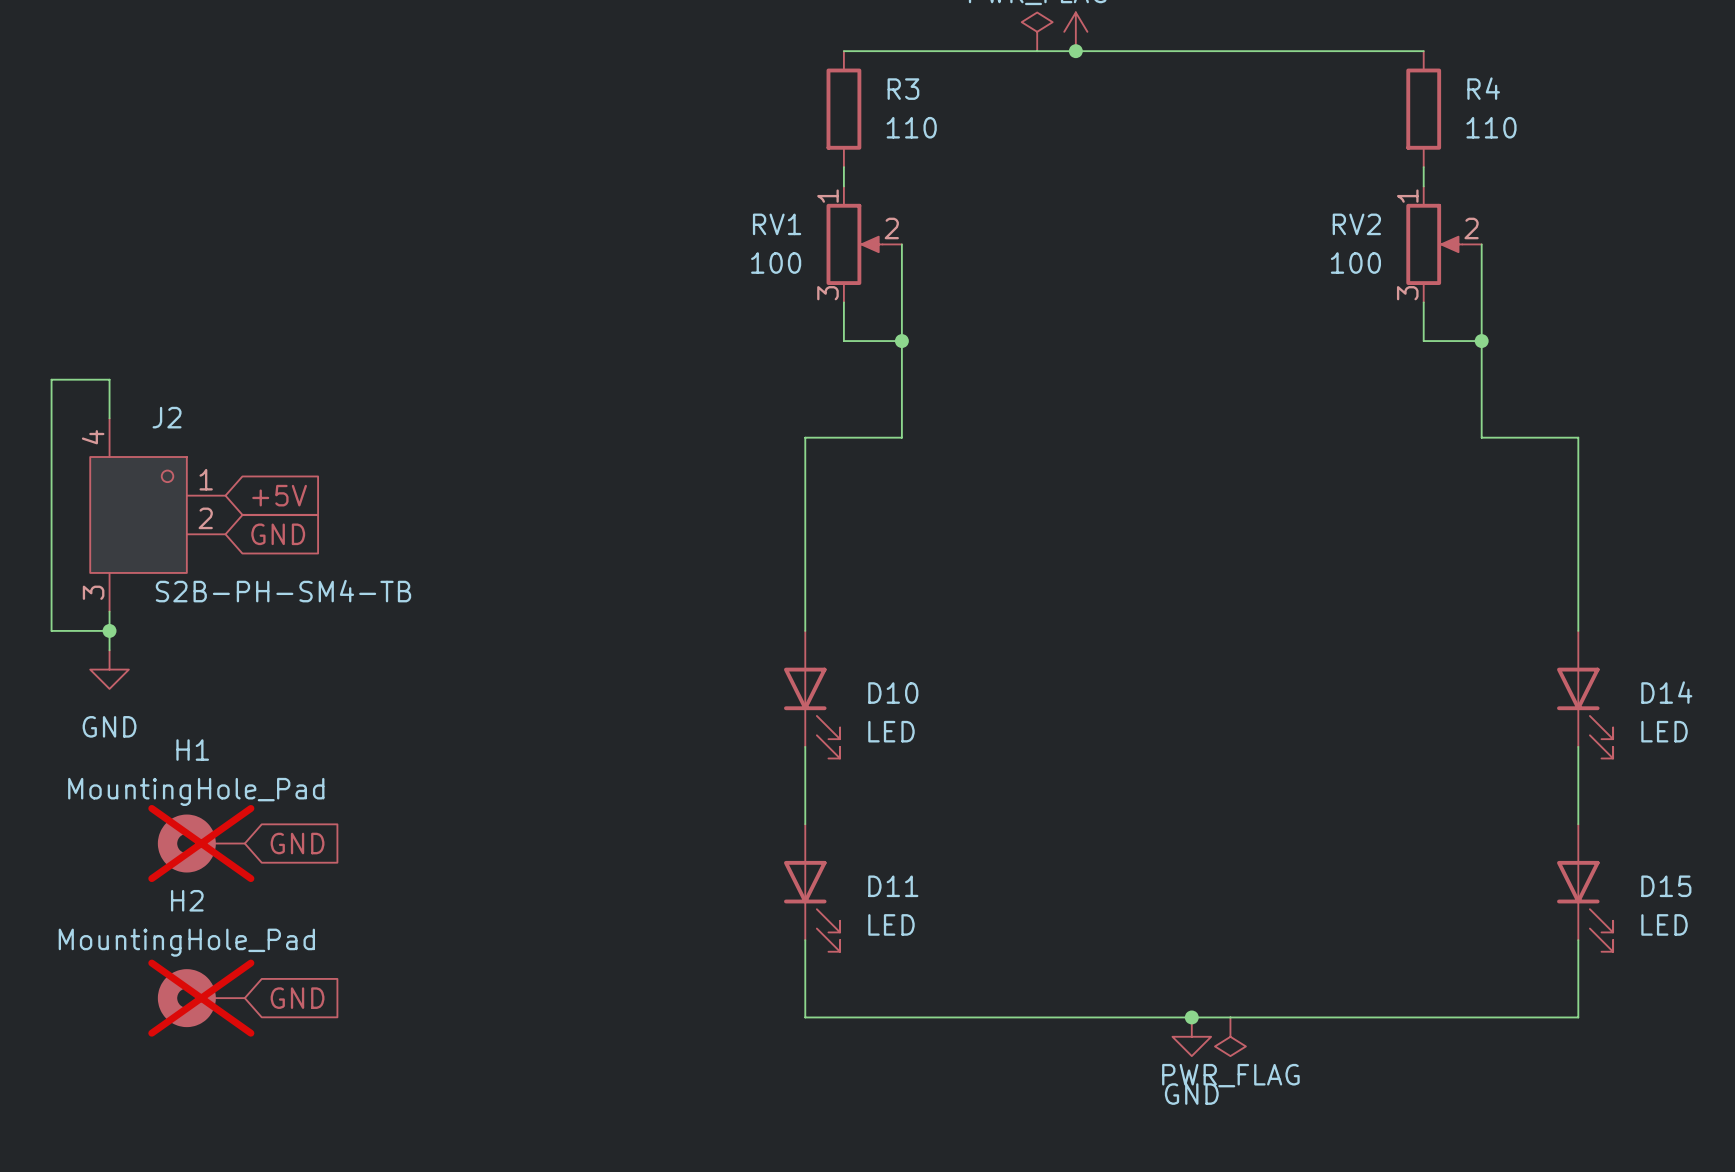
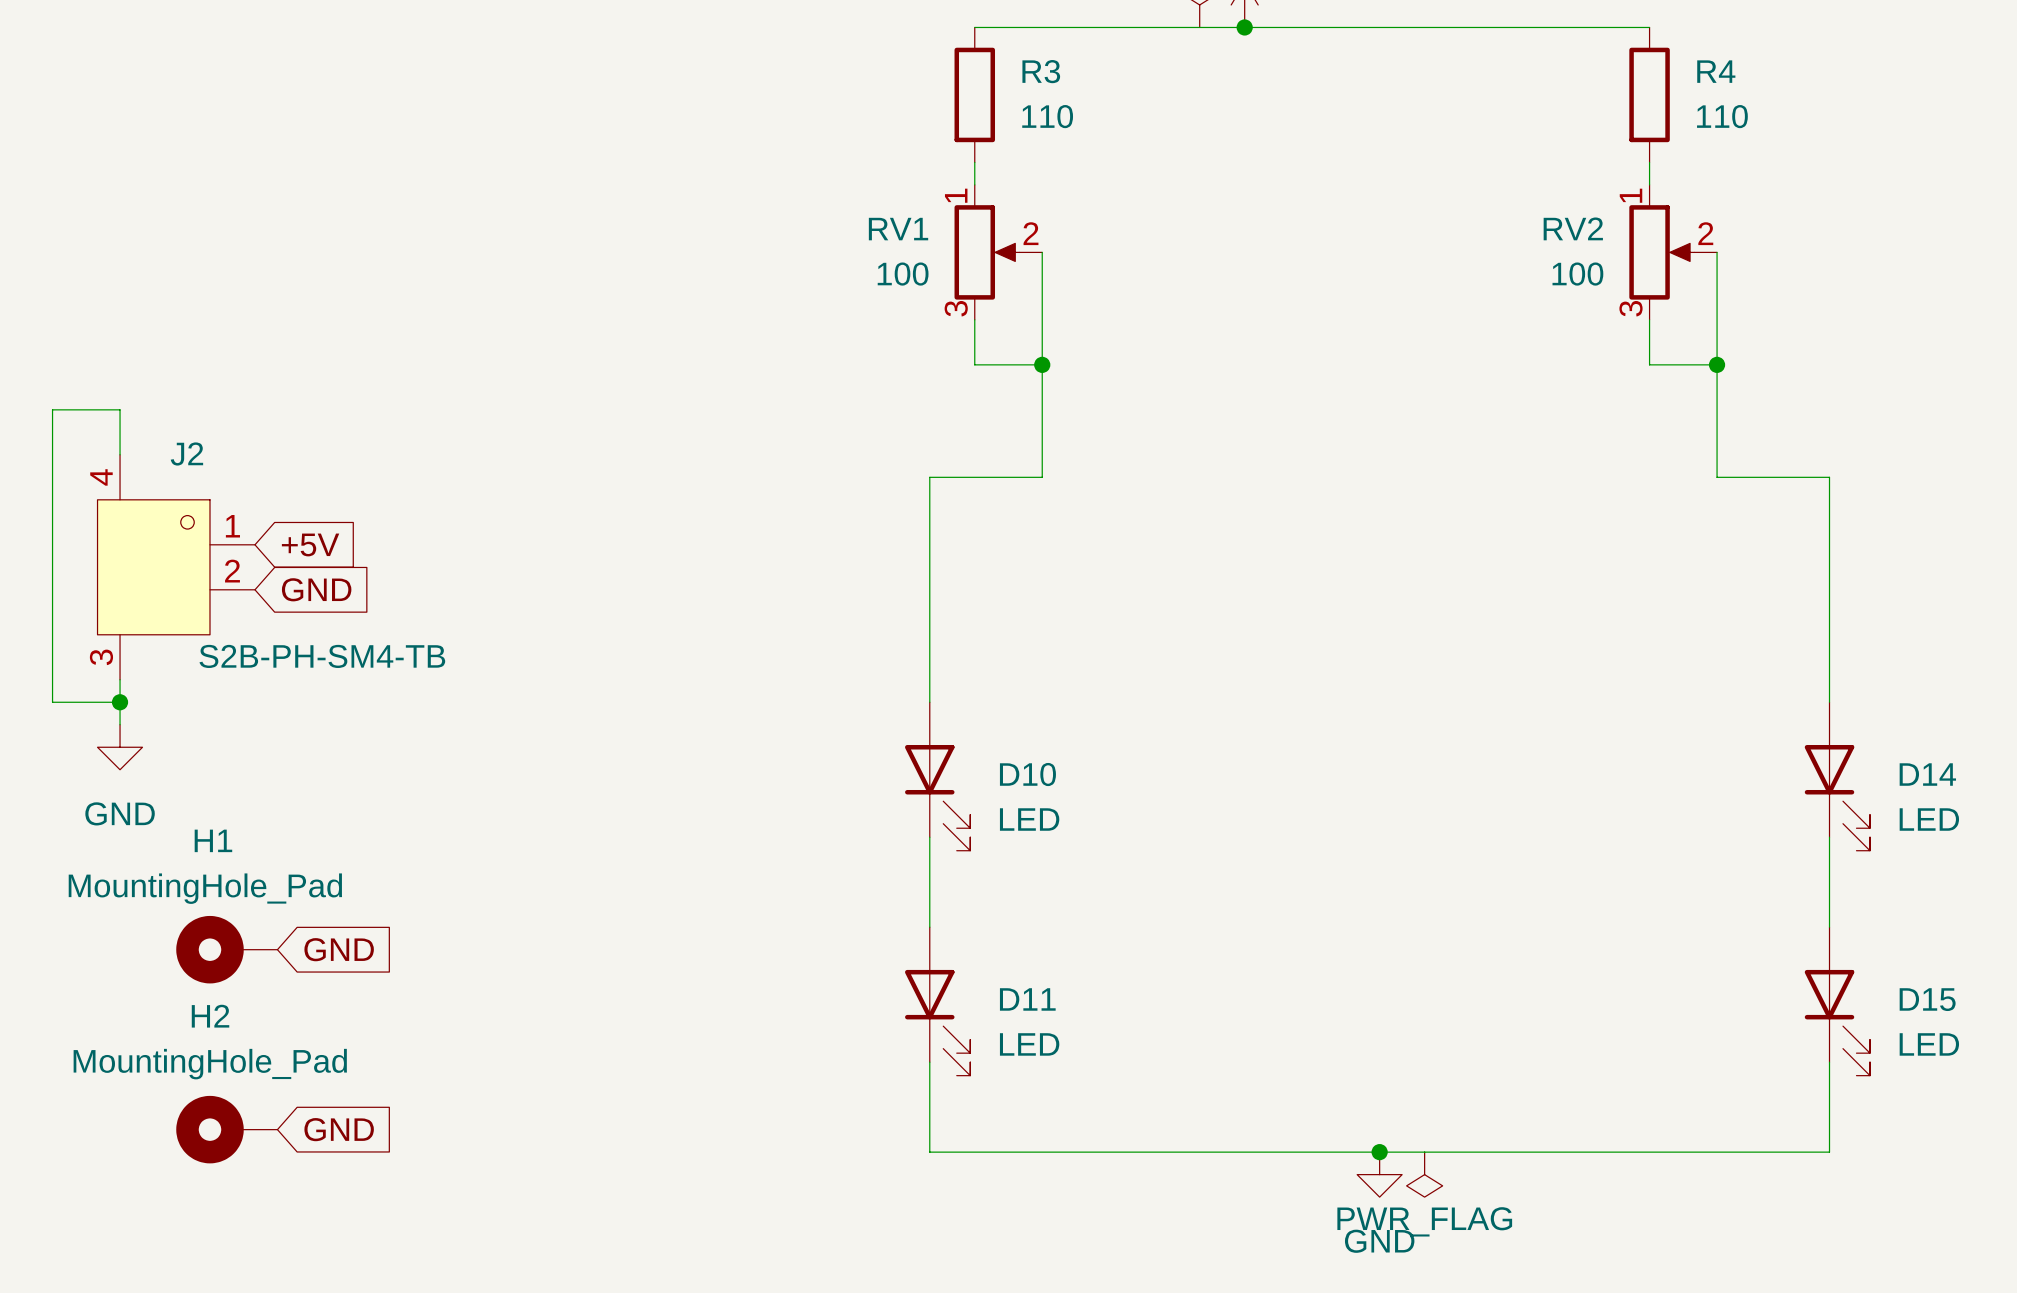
H1 do-not-place cross: (201, 843) -> none
H2 do-not-place cross: (201, 998) -> none

